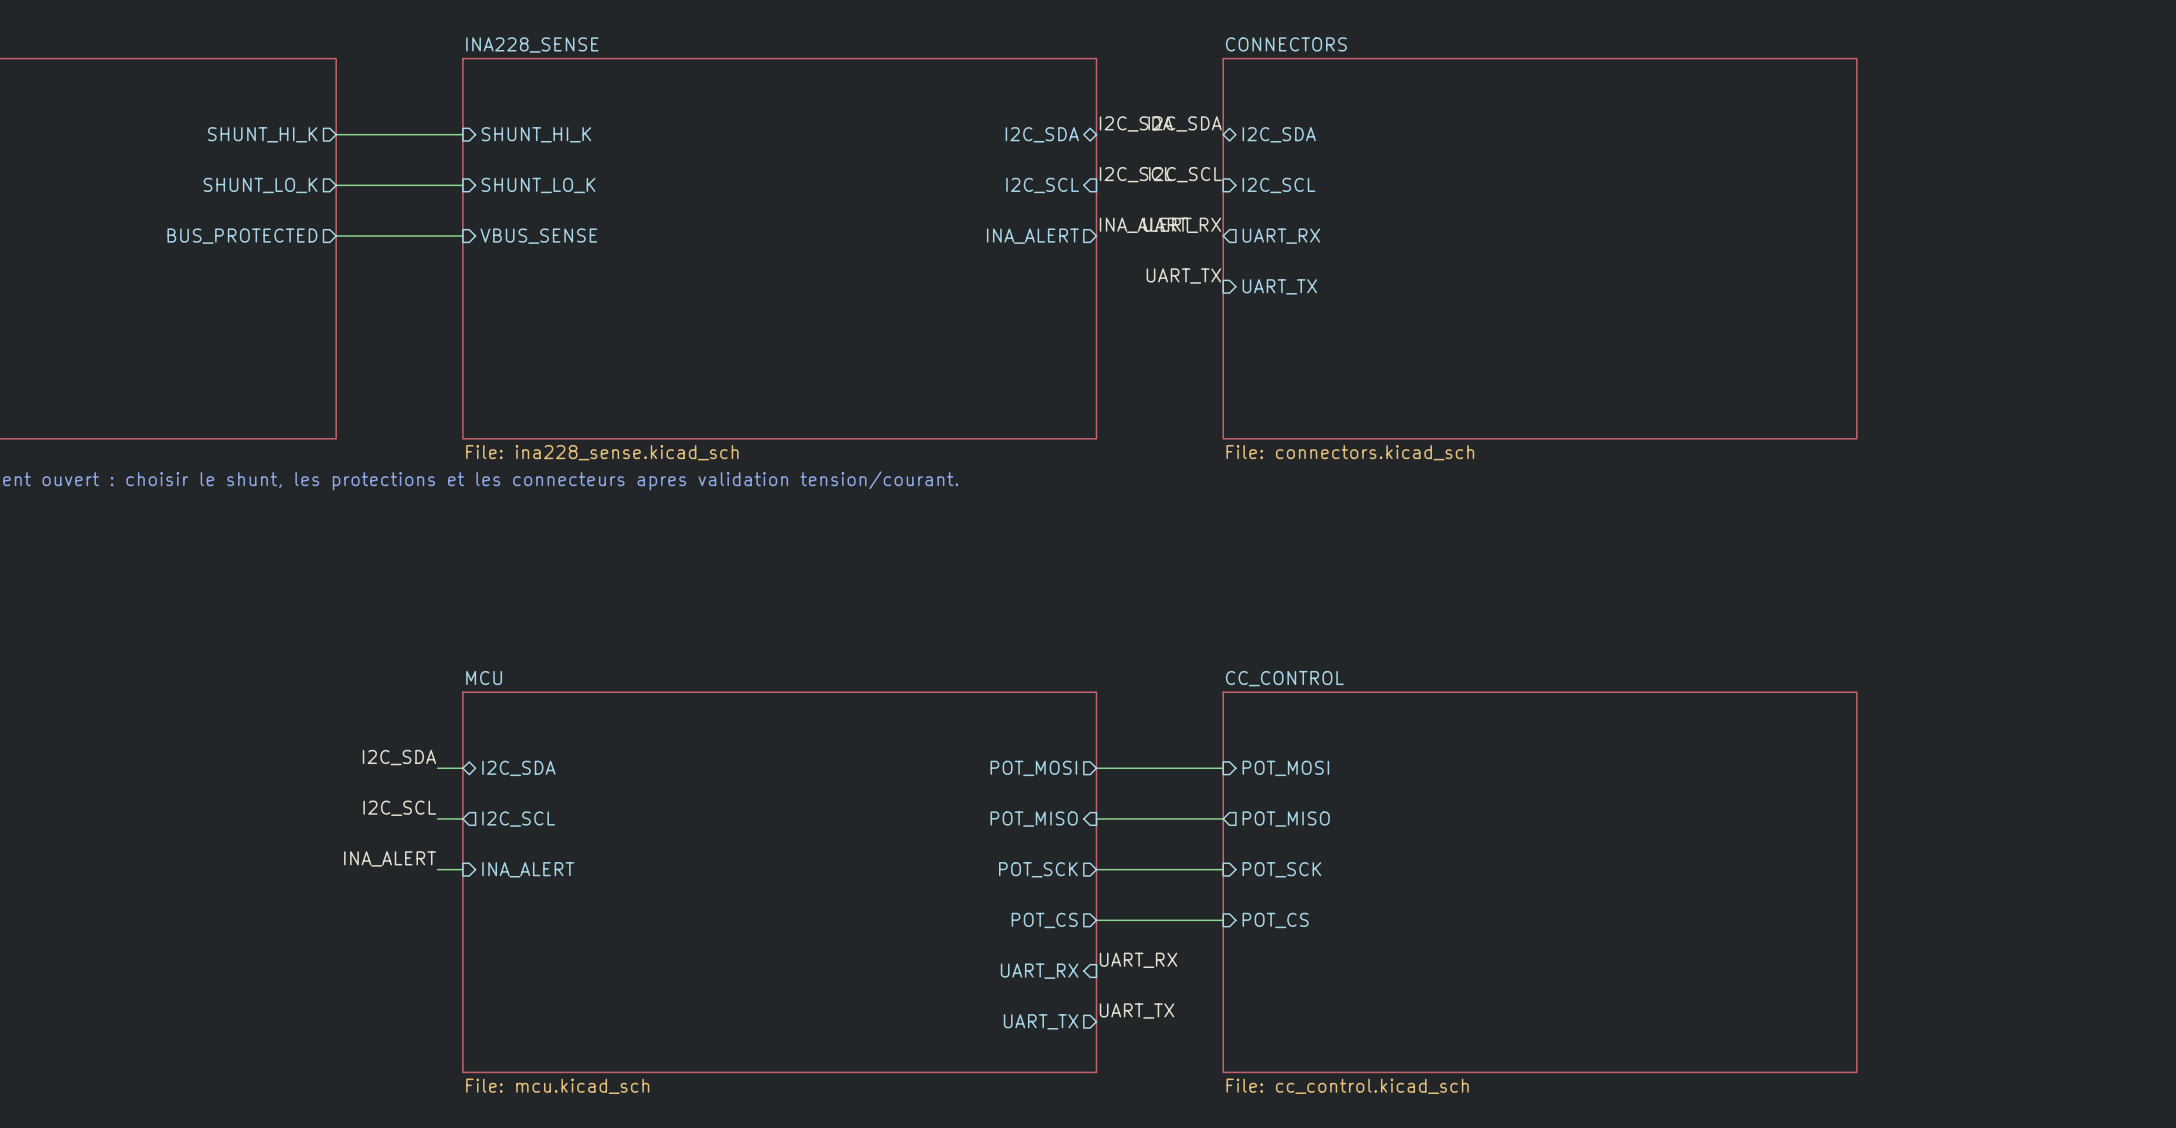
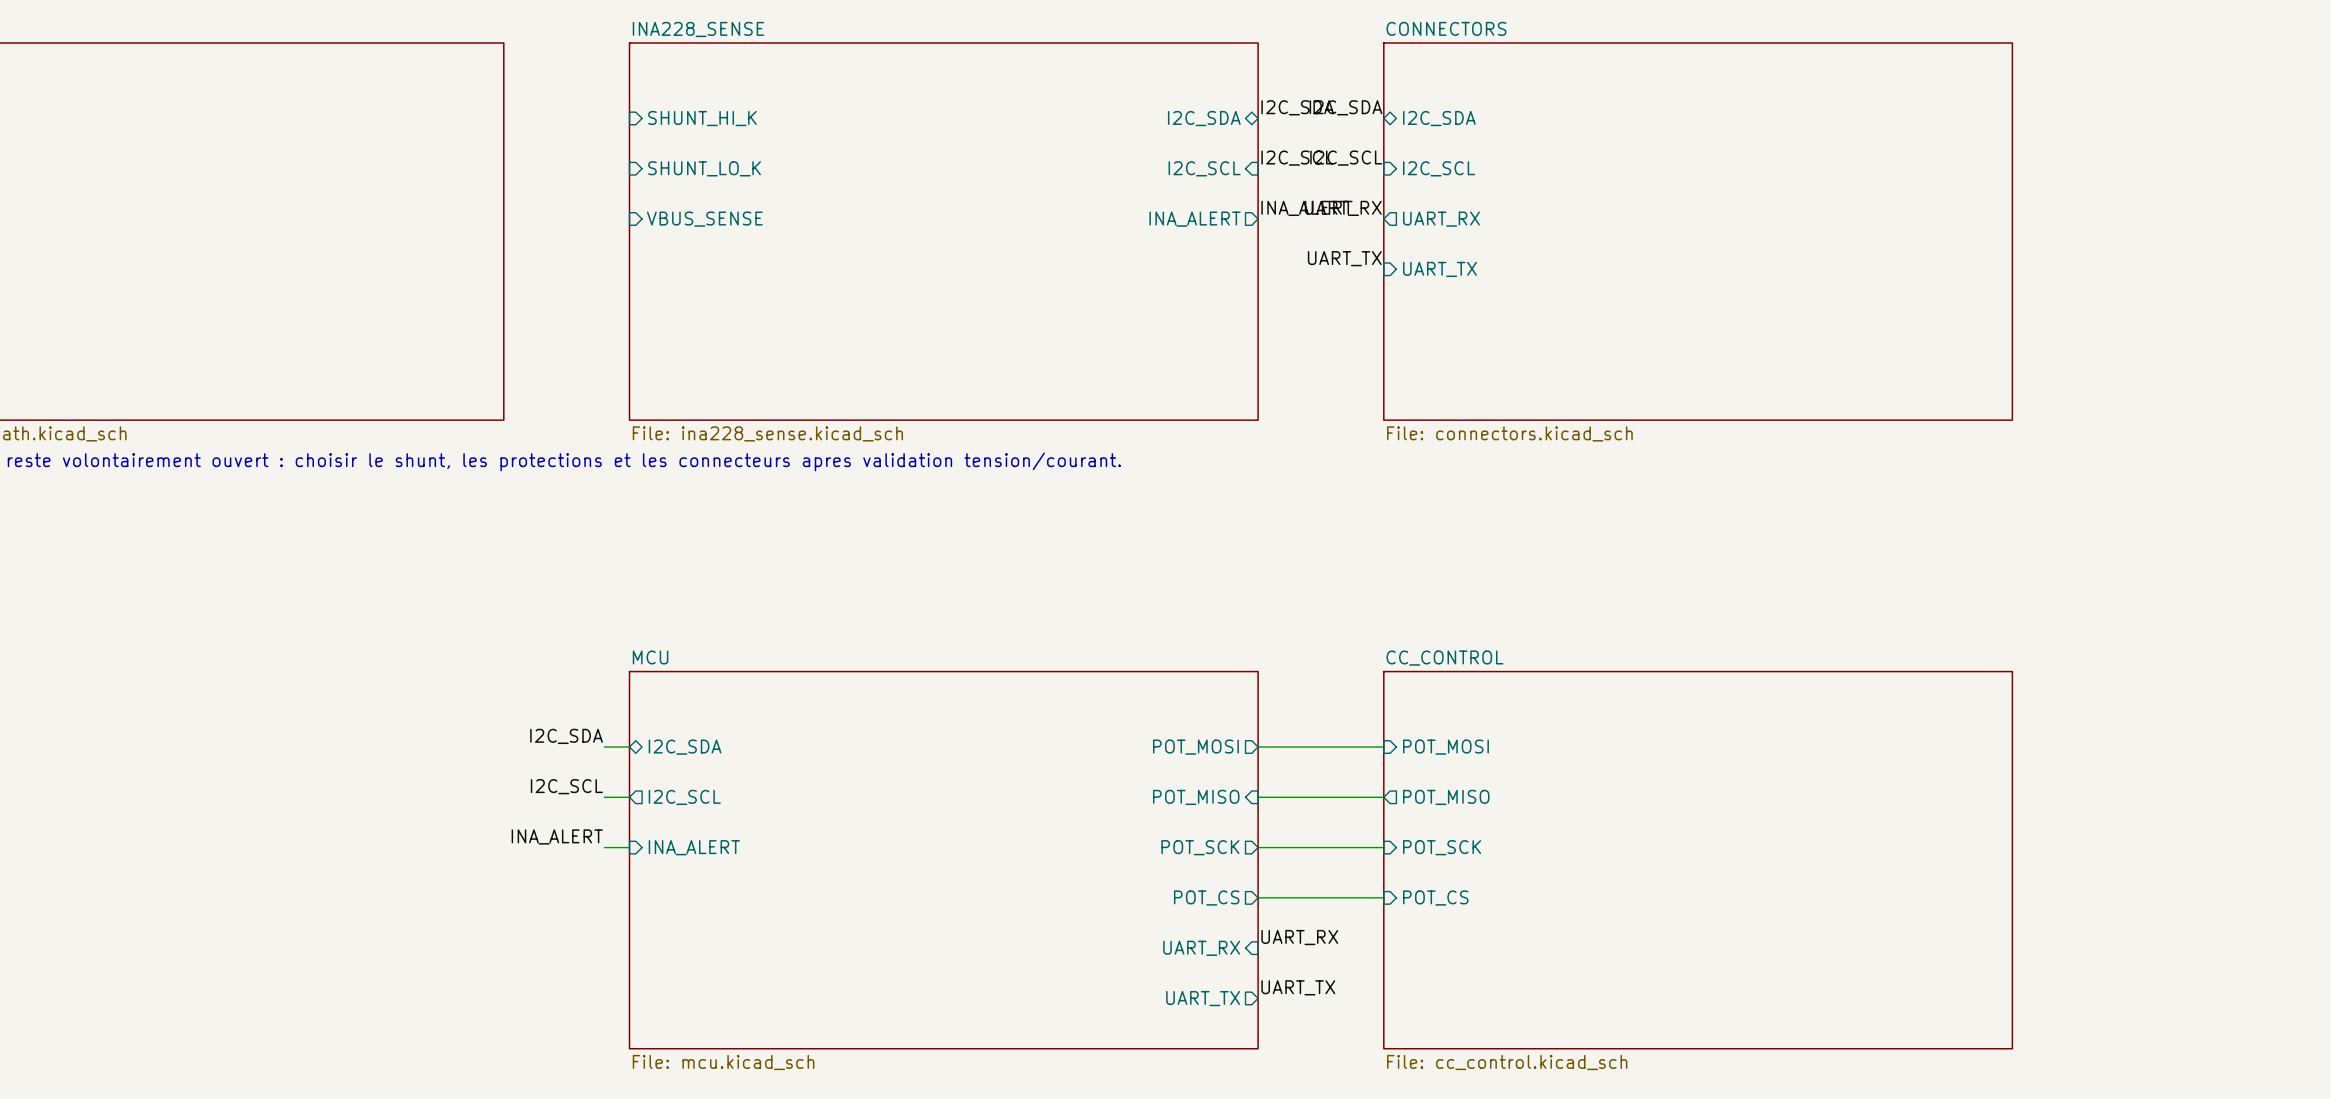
sheet pin: SHUNT_HI_K (262, 134) -> none
wire: (336, 134) (462, 134) -> none
sheet pin: SHUNT_LO_K (260, 185) -> none
wire: (336, 185) (462, 185) -> none
sheet pin: BUS_PROTECTED (242, 236) -> none
wire: (336, 236) (462, 236) -> none

